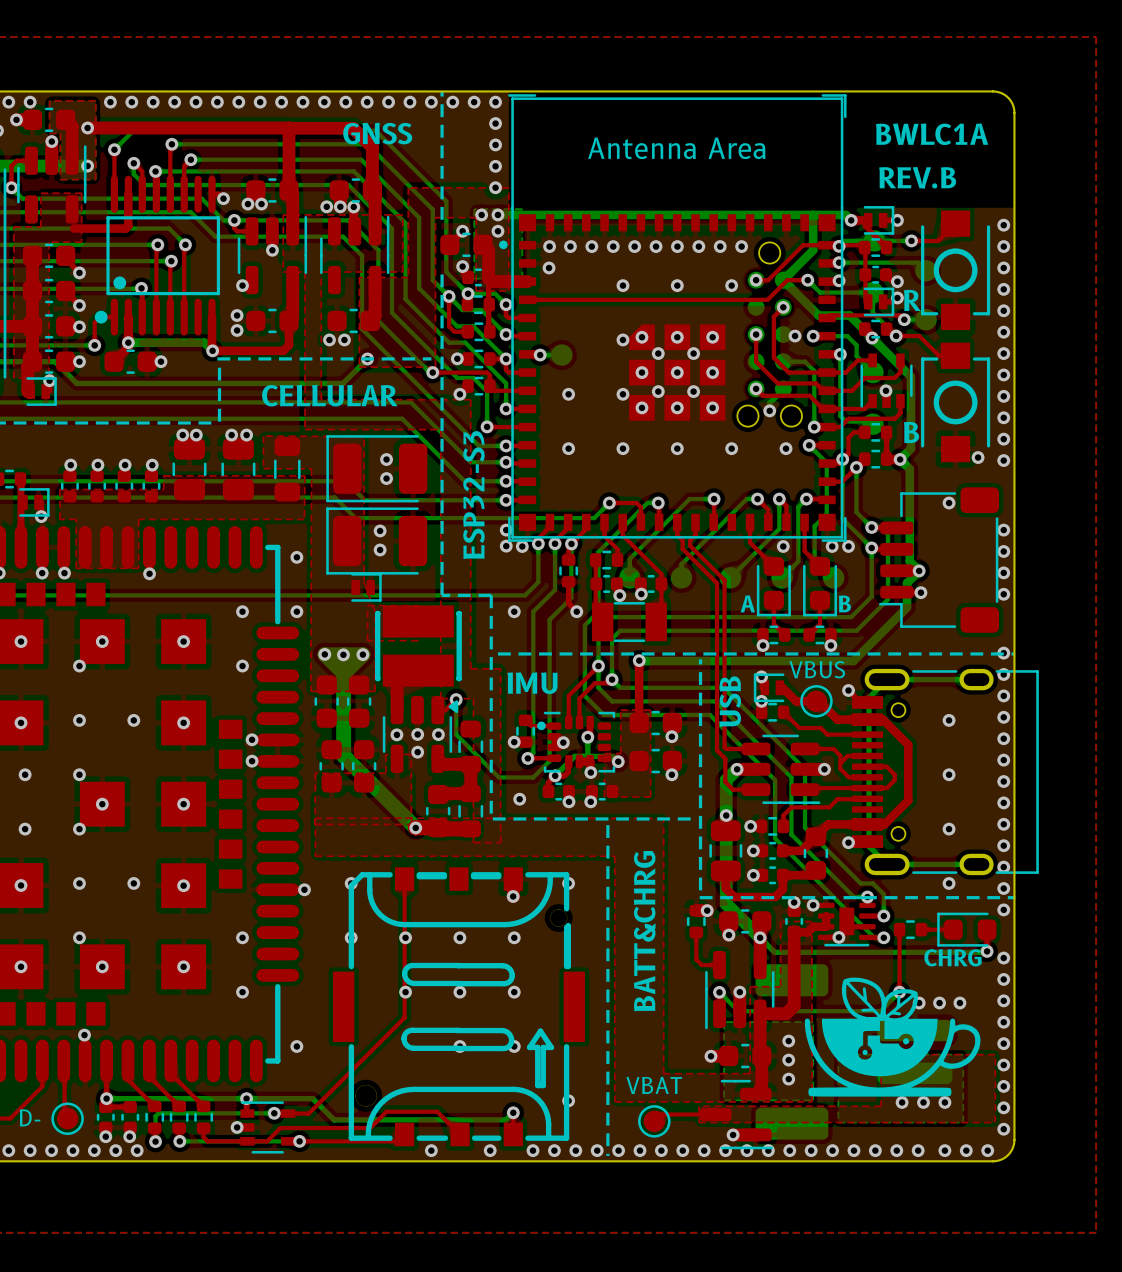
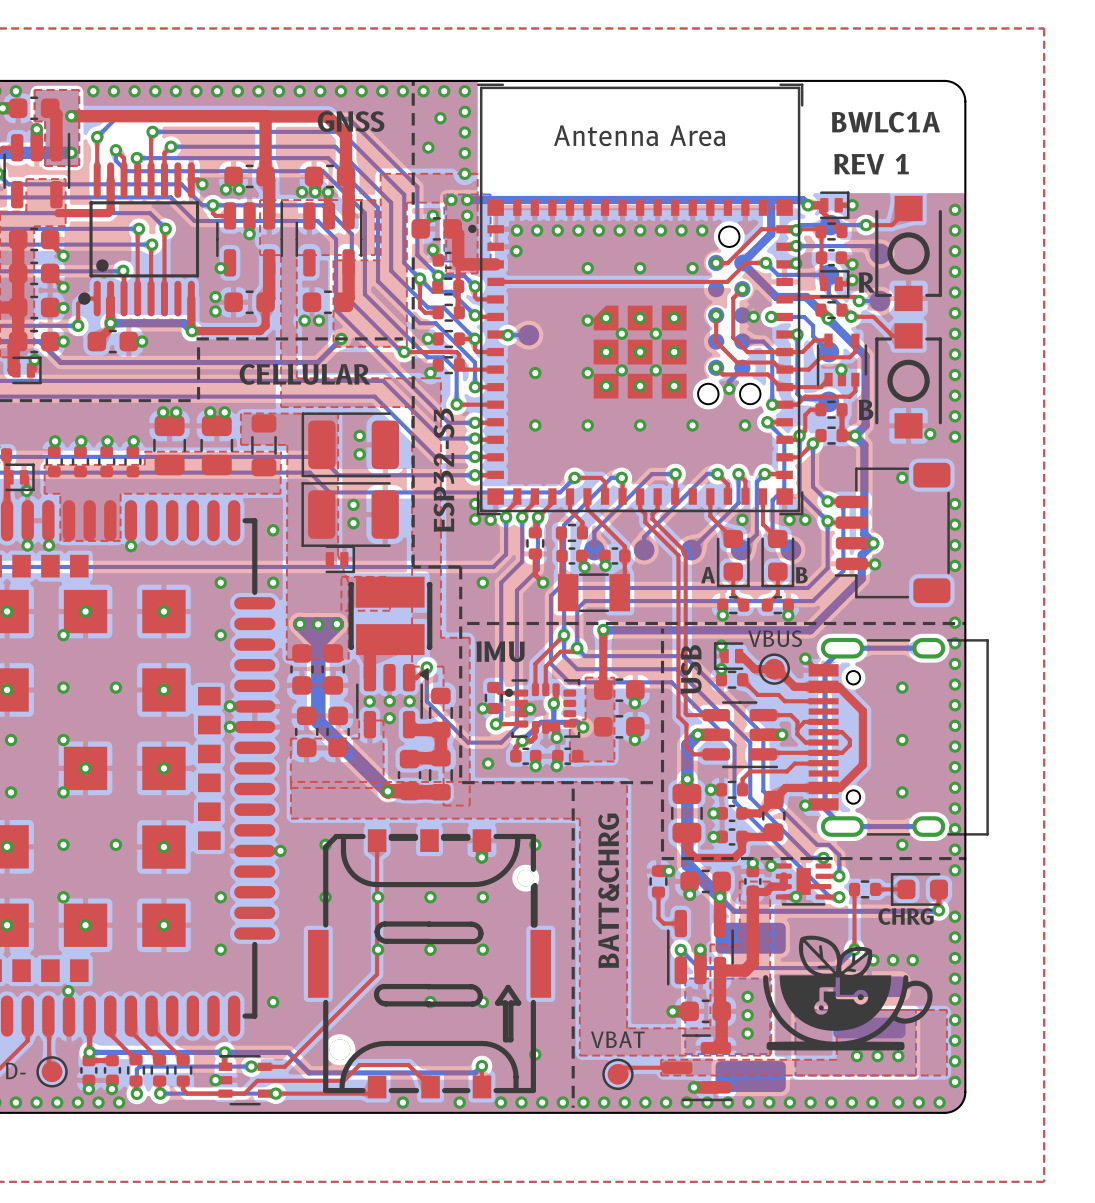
via: none -> (440, 118)
via: none -> (428, 147)
text: REV.B (917, 177) -> REV 1 (871, 164)

